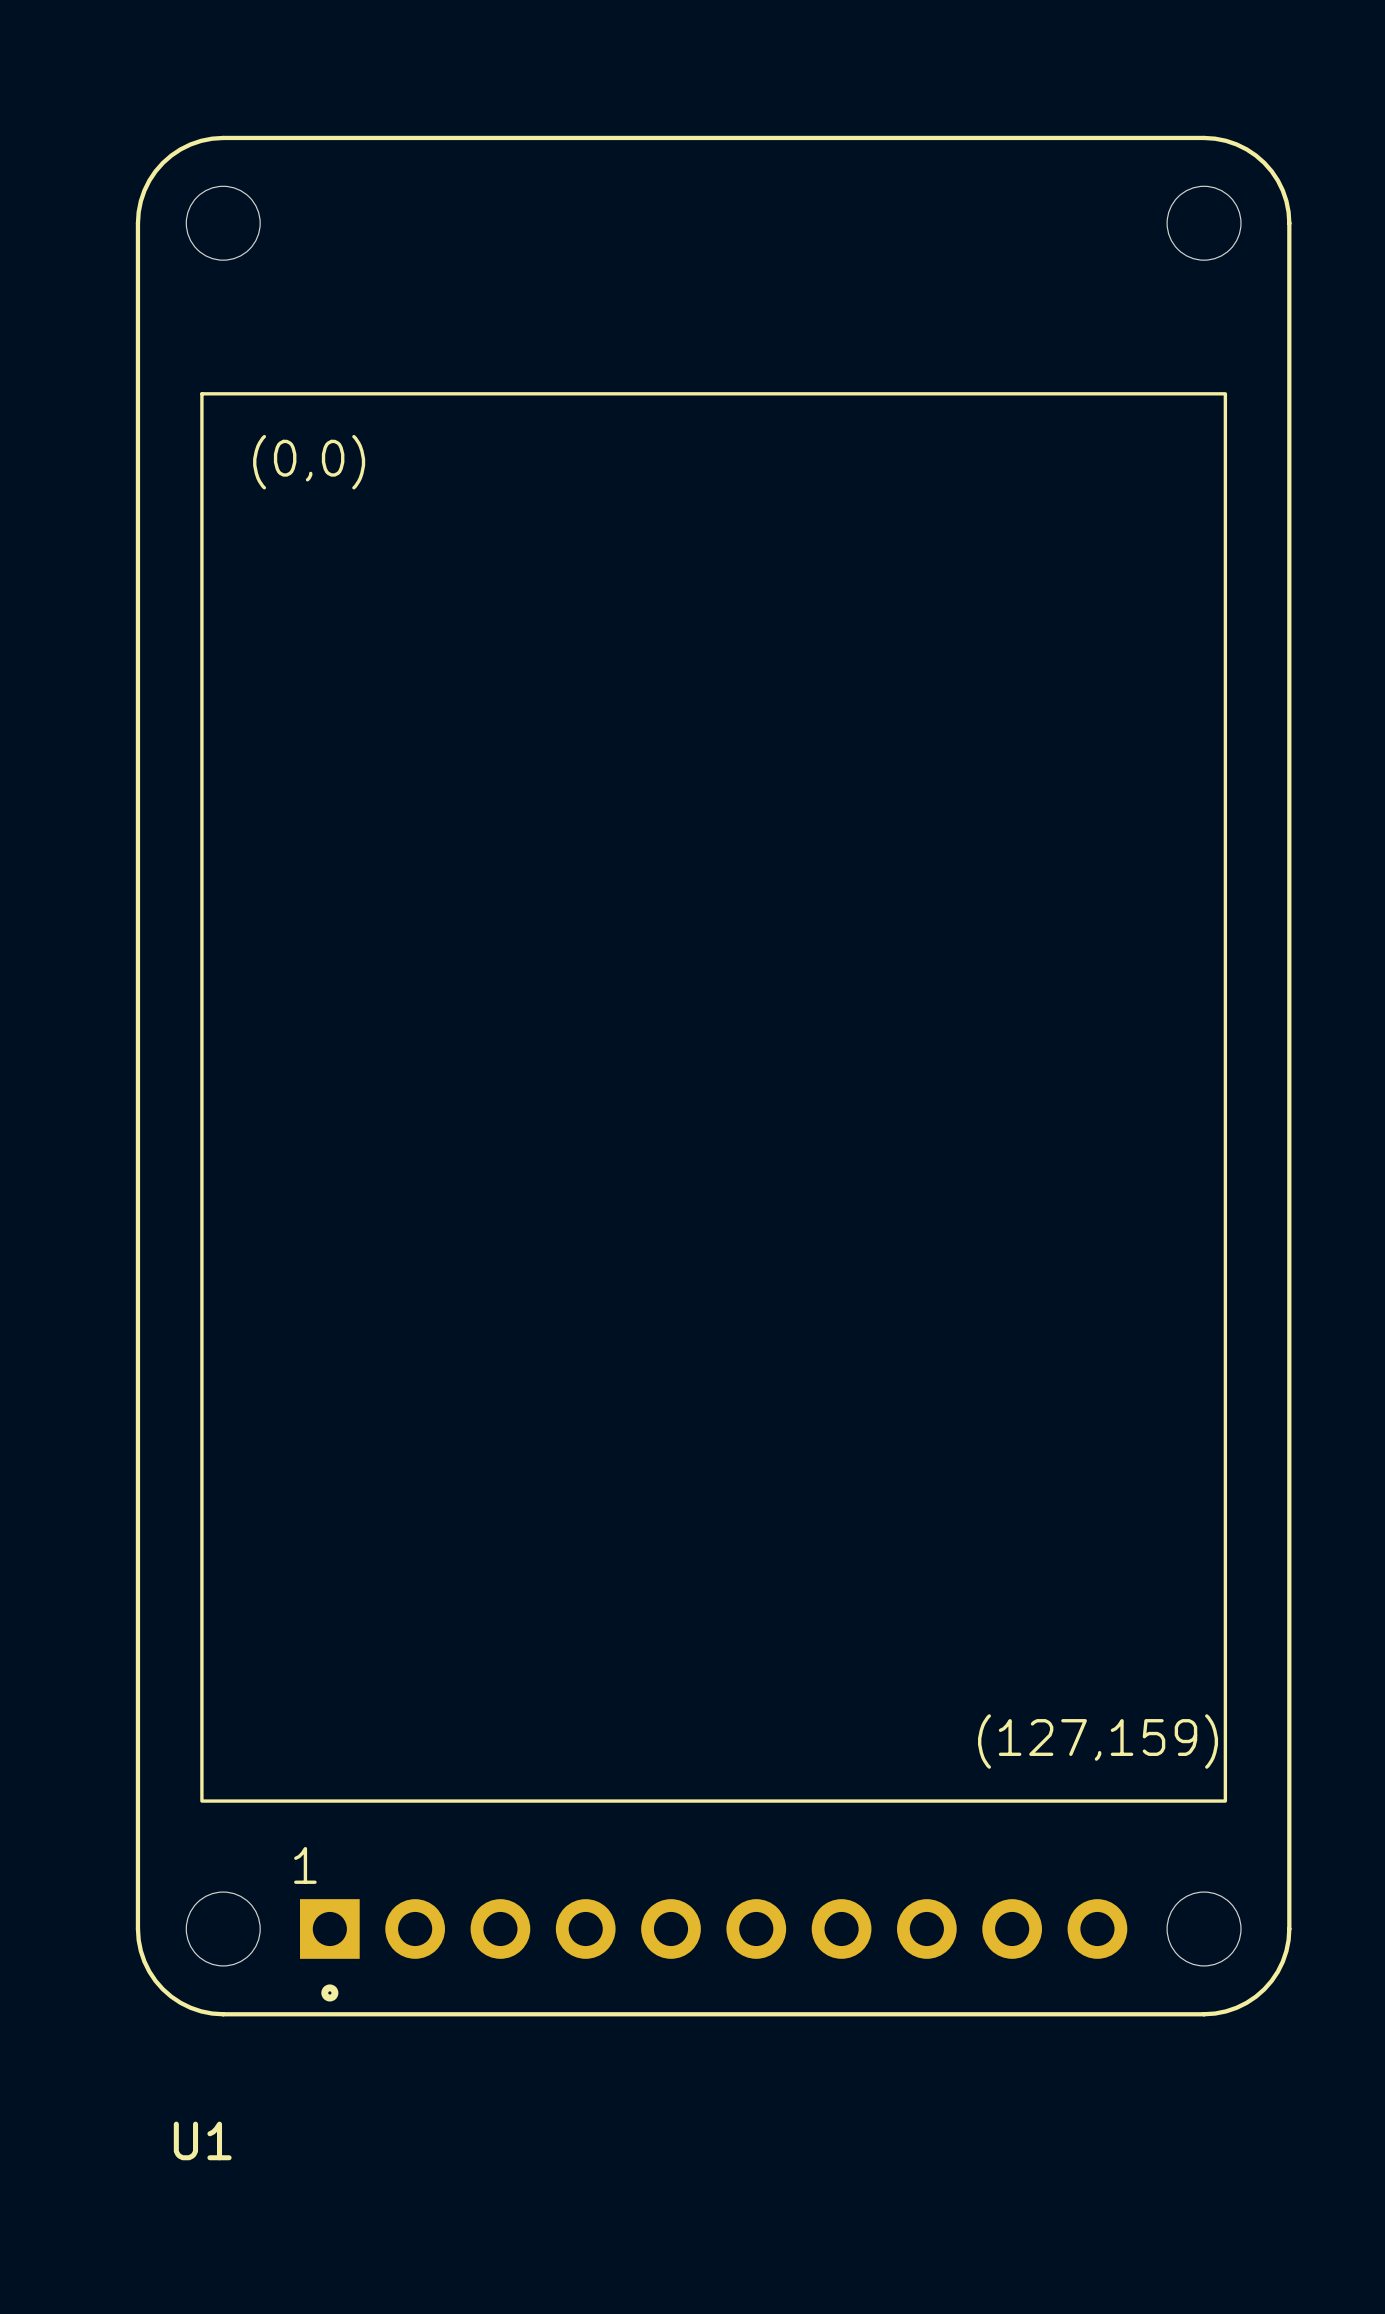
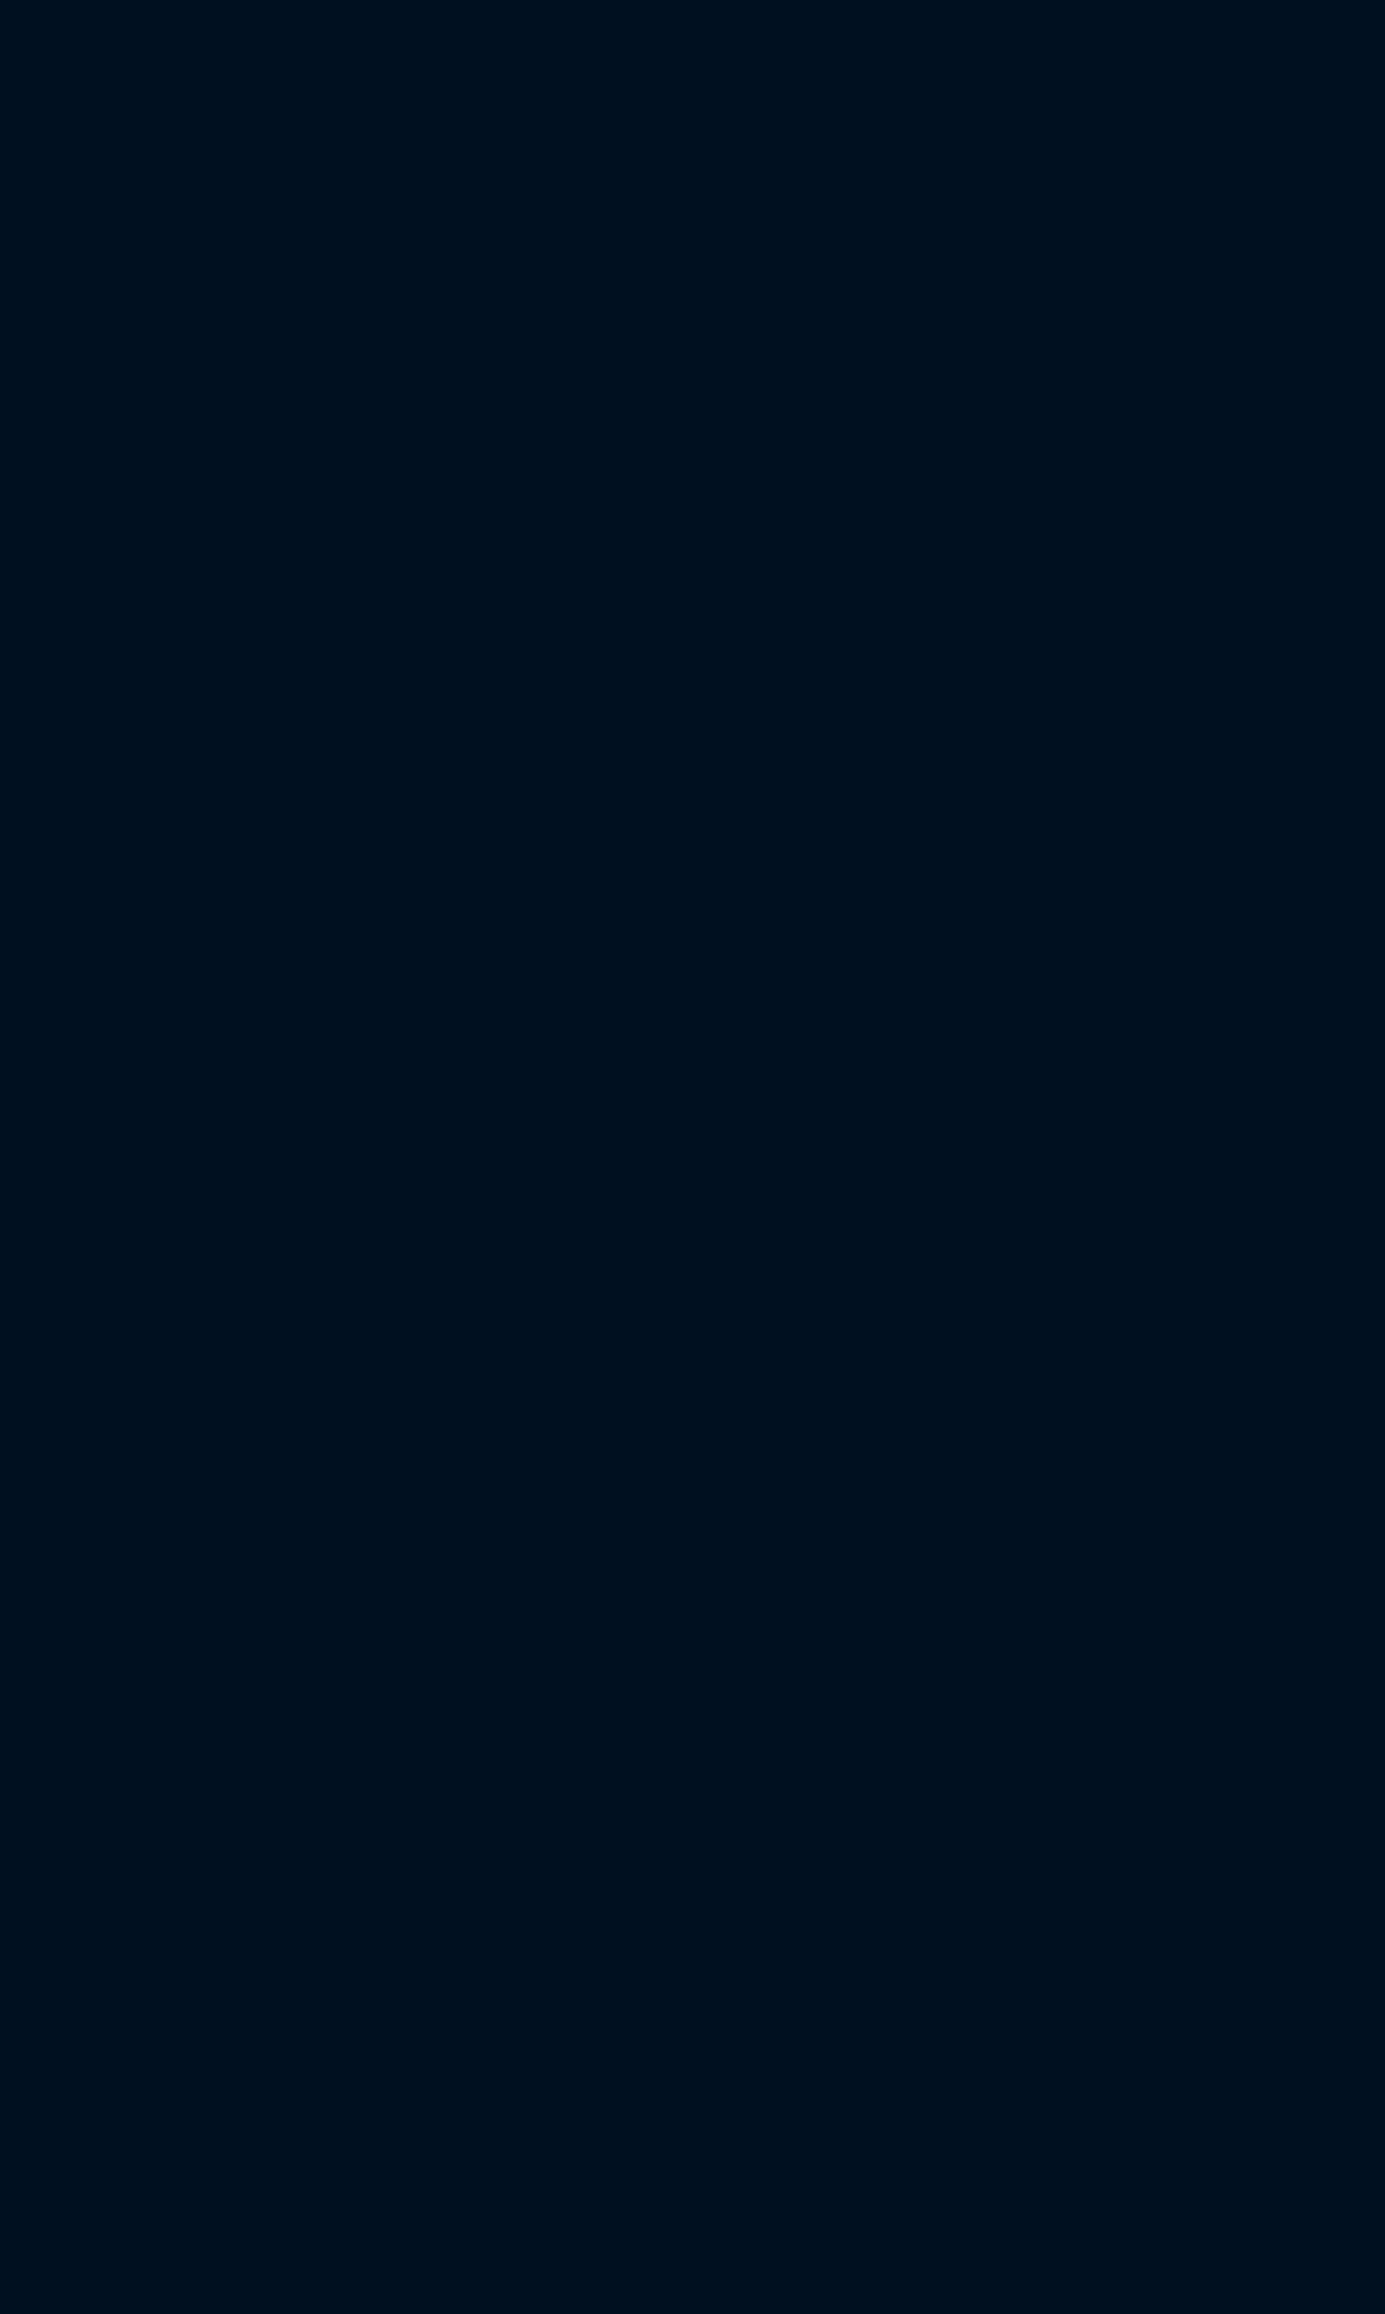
U1: (713, 1076) -> none

